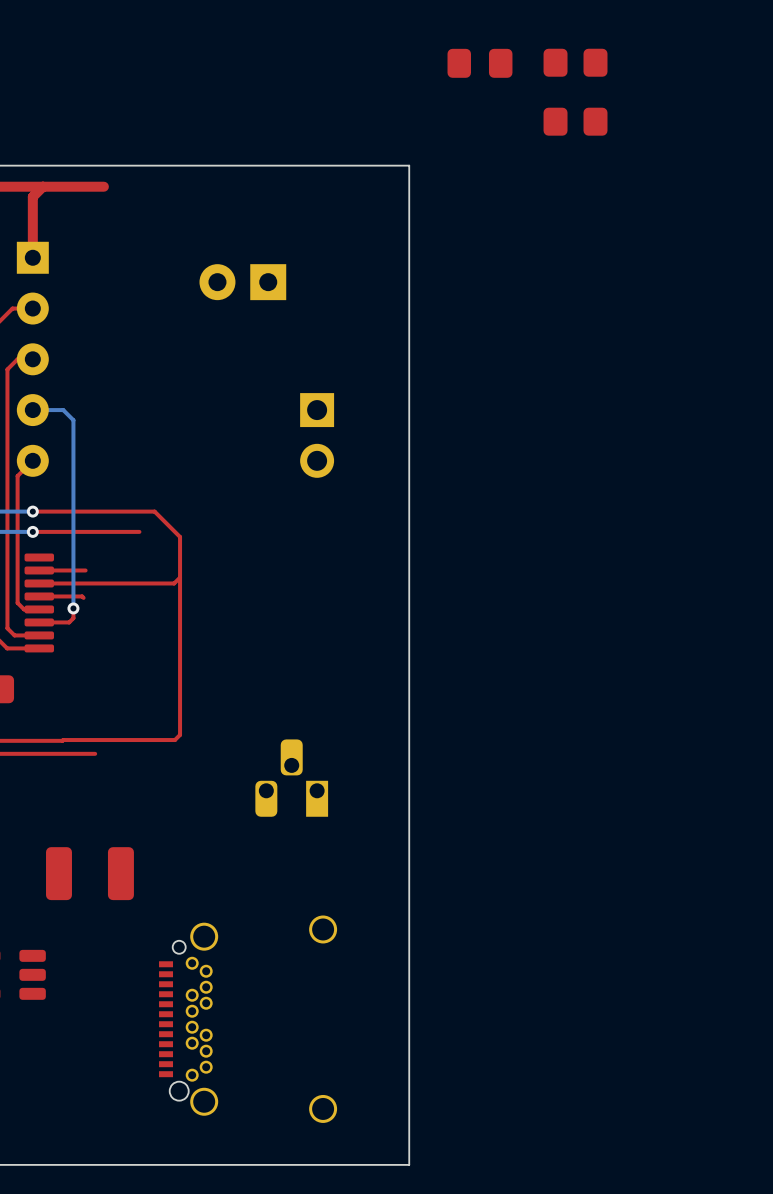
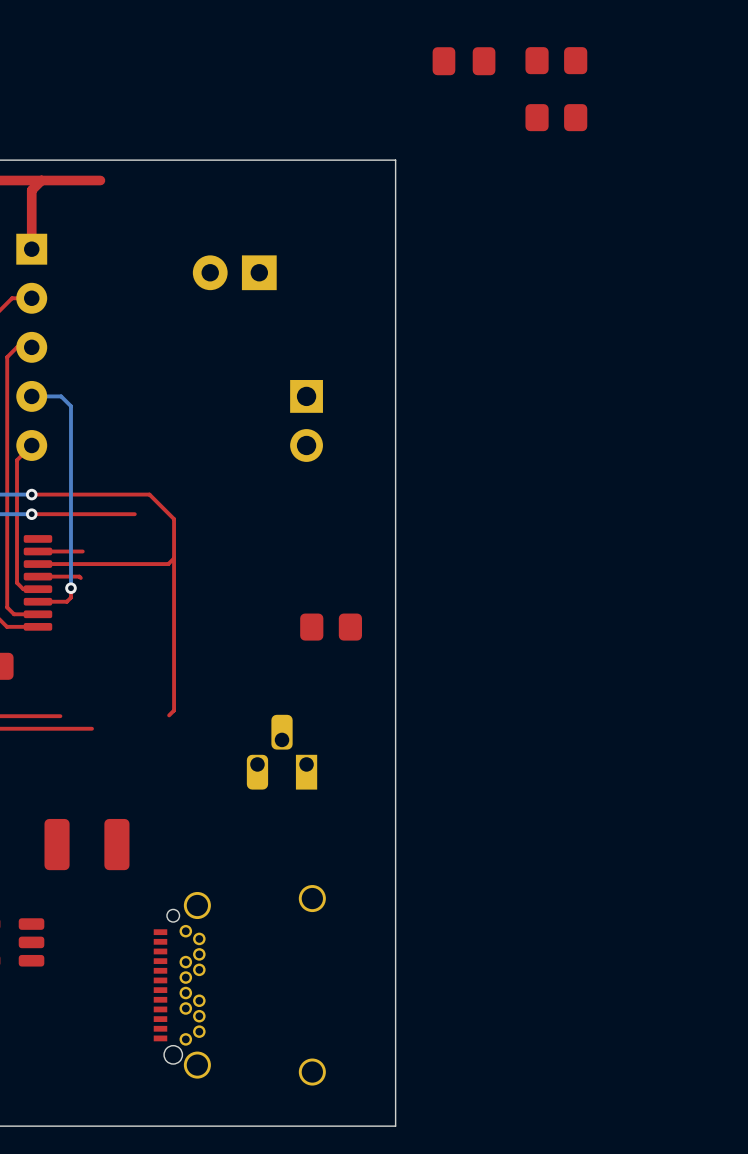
part: none -> (331, 627)
top track: (174, 740) (62, 740) -> none

